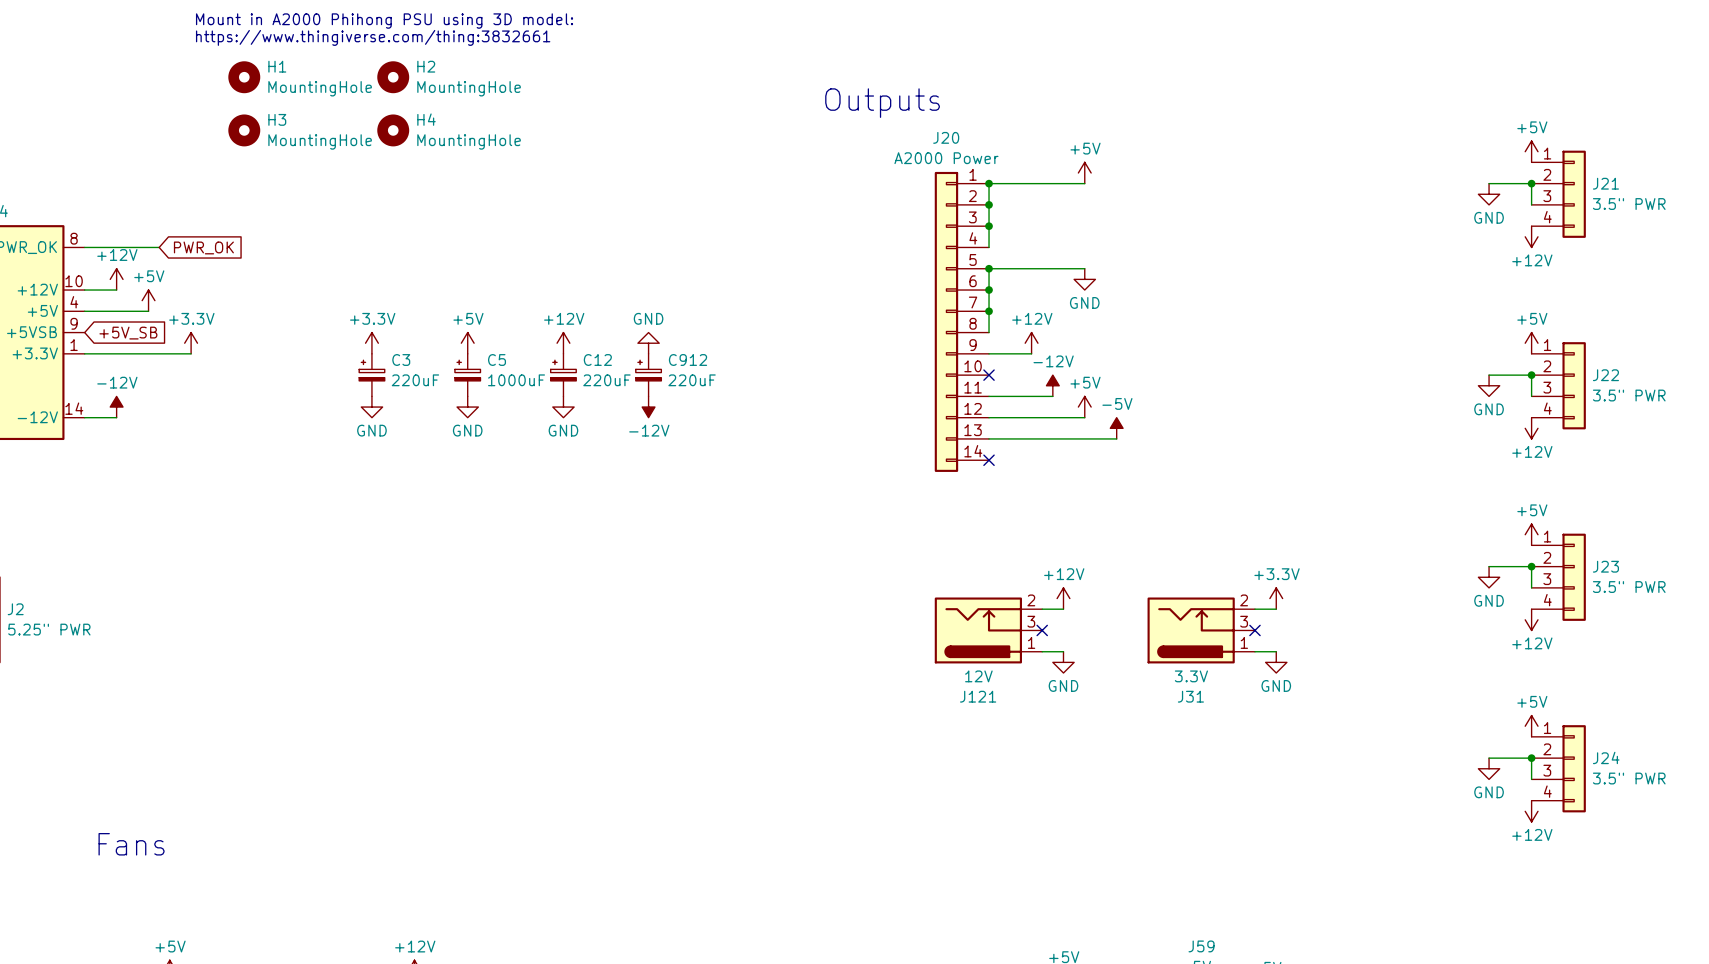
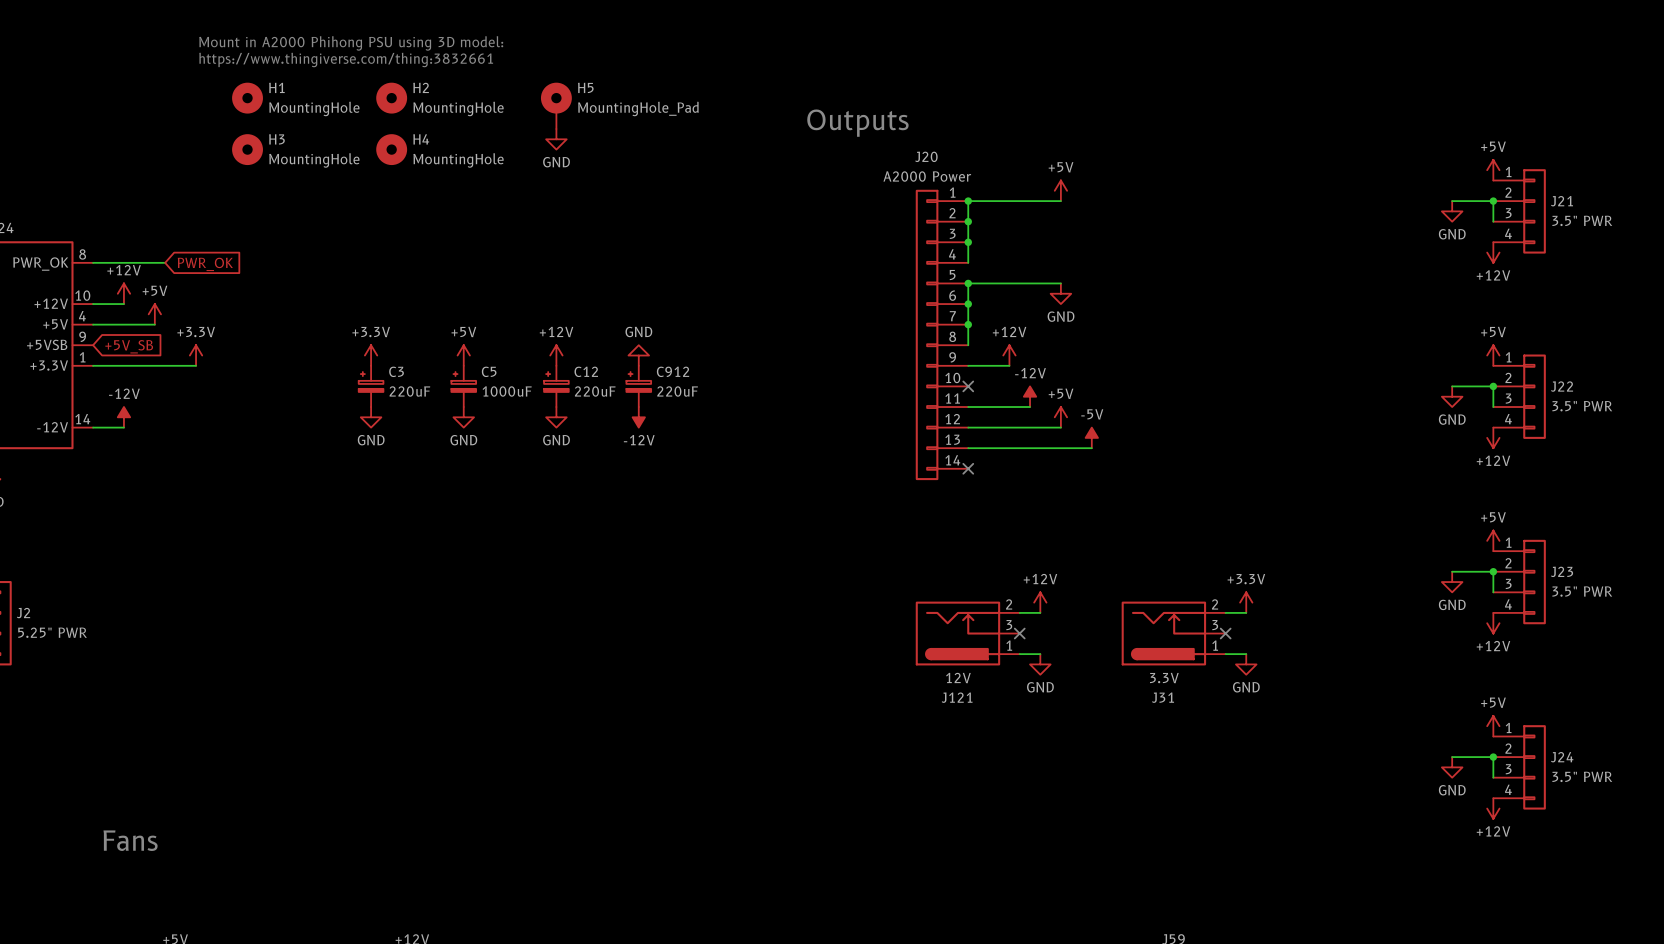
H5: none -> MountingHole_Pad (556, 105)
power symbol: none -> GND (556, 139)

